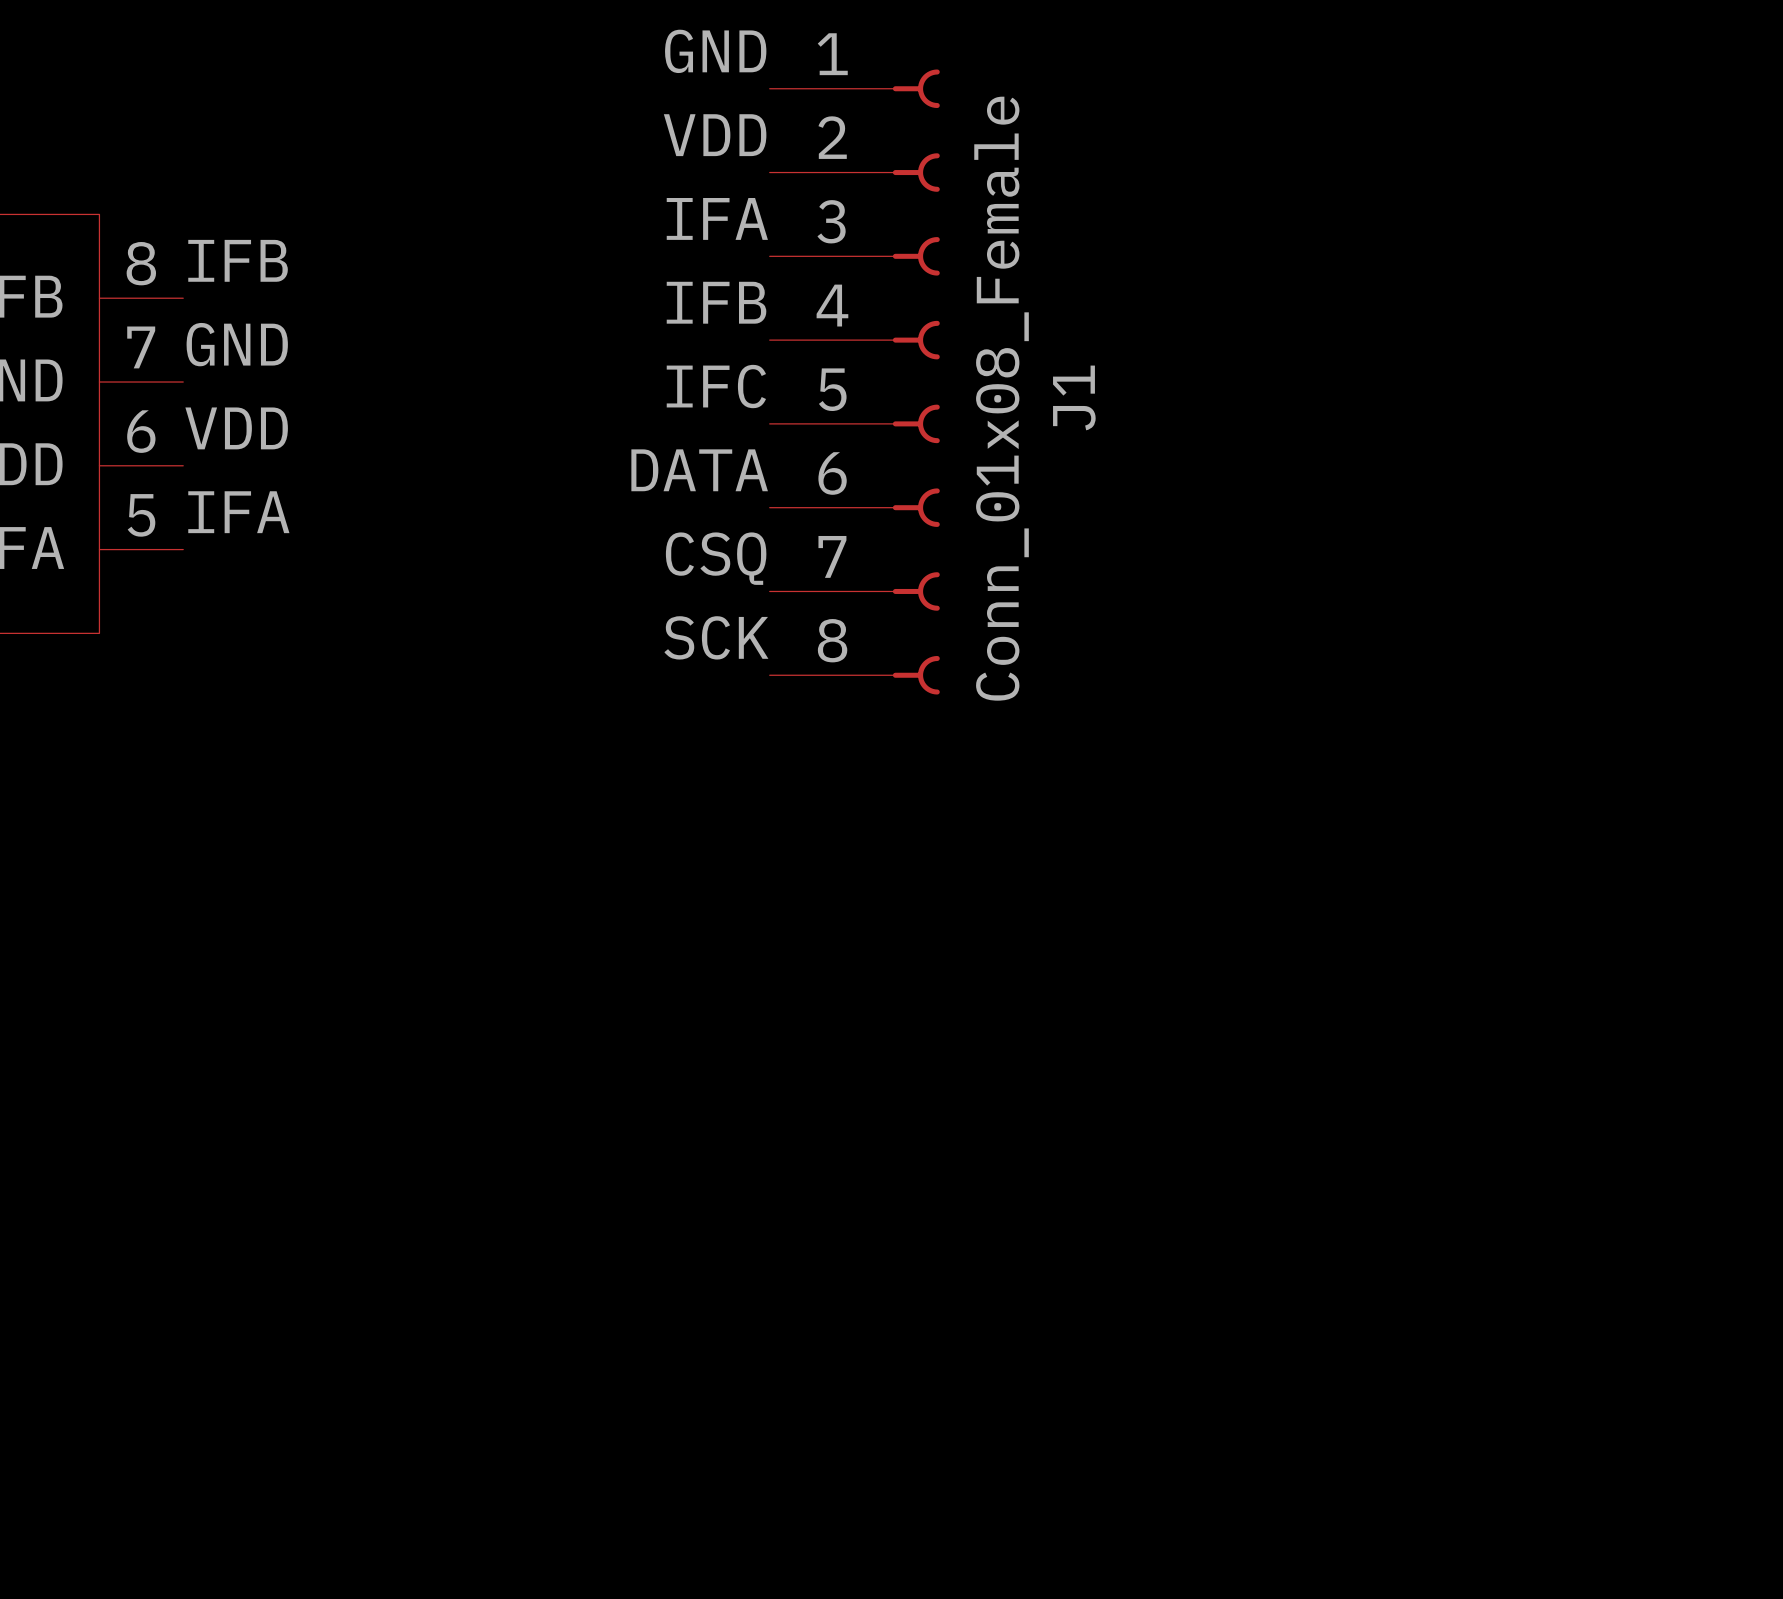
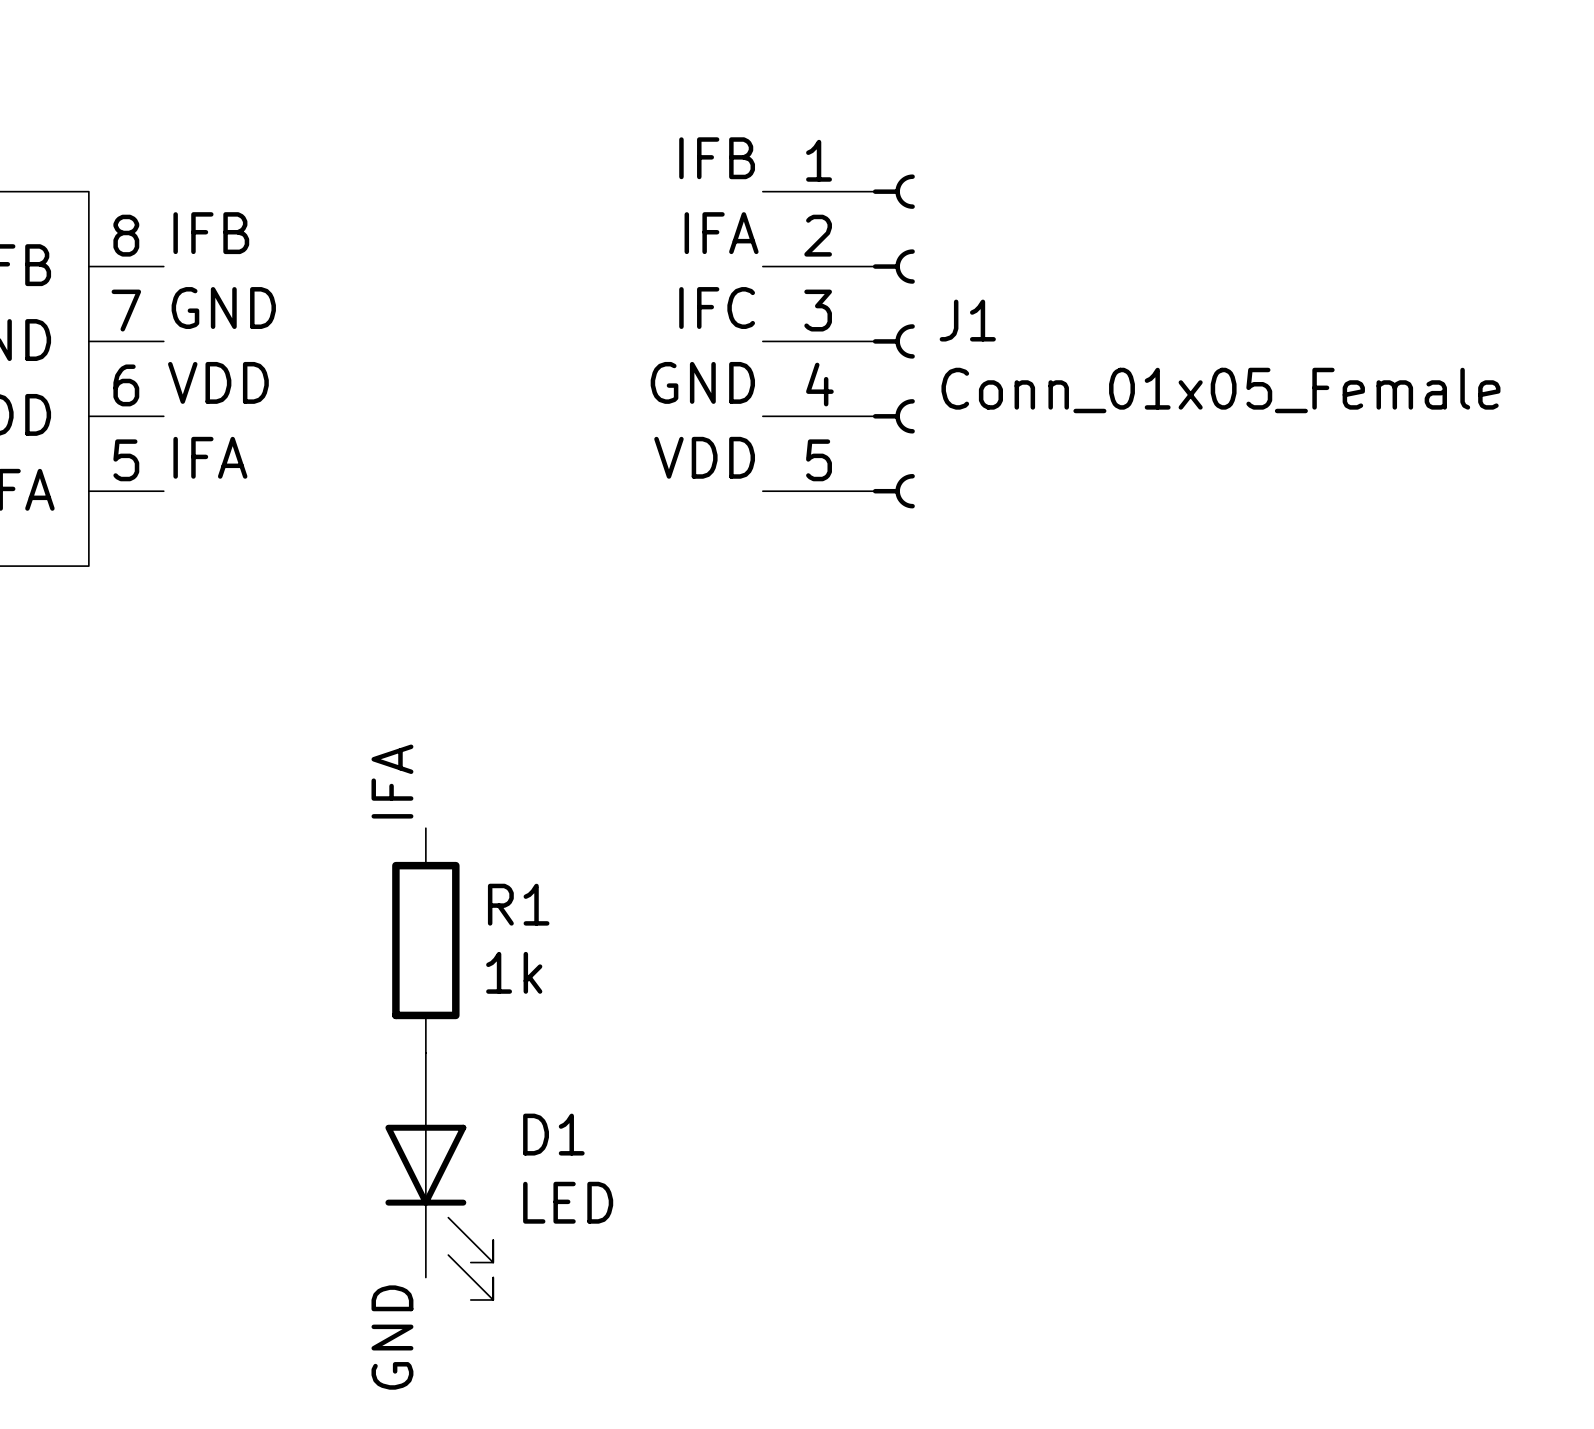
label position: GND (715, 51) -> GND (702, 382)
J1 symbol: [769, 69, 940, 695] -> [762, 174, 915, 509]
label position: VDD (715, 135) -> VDD (704, 457)
label position: IFA (717, 218) -> IFA (721, 233)
label position: IFB (716, 302) -> IFB (717, 158)
label position: IFC (716, 386) -> IFC (717, 308)
J1 name position: J1 (1074, 397) -> J1 (967, 320)
J1 value: Conn_01x08_Female (1001, 398) -> Conn_01x05_Female (1220, 390)
label: DATA (699, 470) -> none
label: CSQ (716, 558) -> none
label: SCK (716, 637) -> none
label: none -> IFA (392, 781)
R1: none -> 1k (425, 940)
D1: none -> LED (439, 1176)
label: none -> GND (392, 1337)

